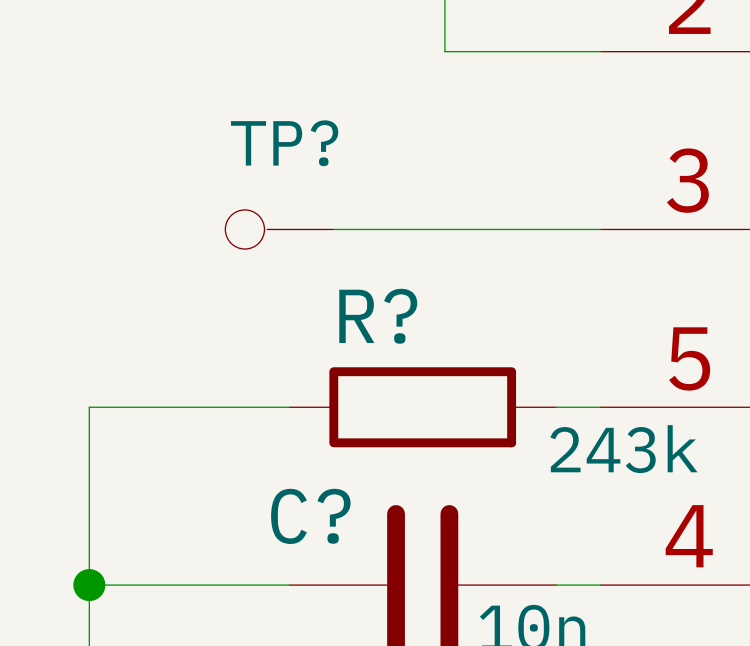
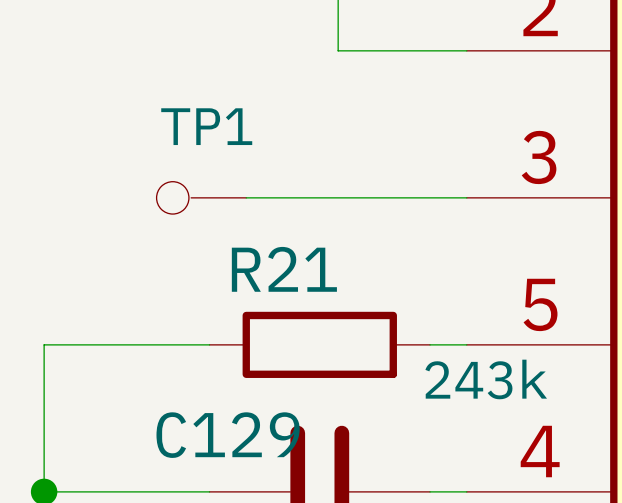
TP? name: TP? (284, 143) -> TP1 (206, 126)
R? name: R? (378, 316) -> R21 (284, 269)
C? name: C? (310, 516) -> C129 (228, 435)

